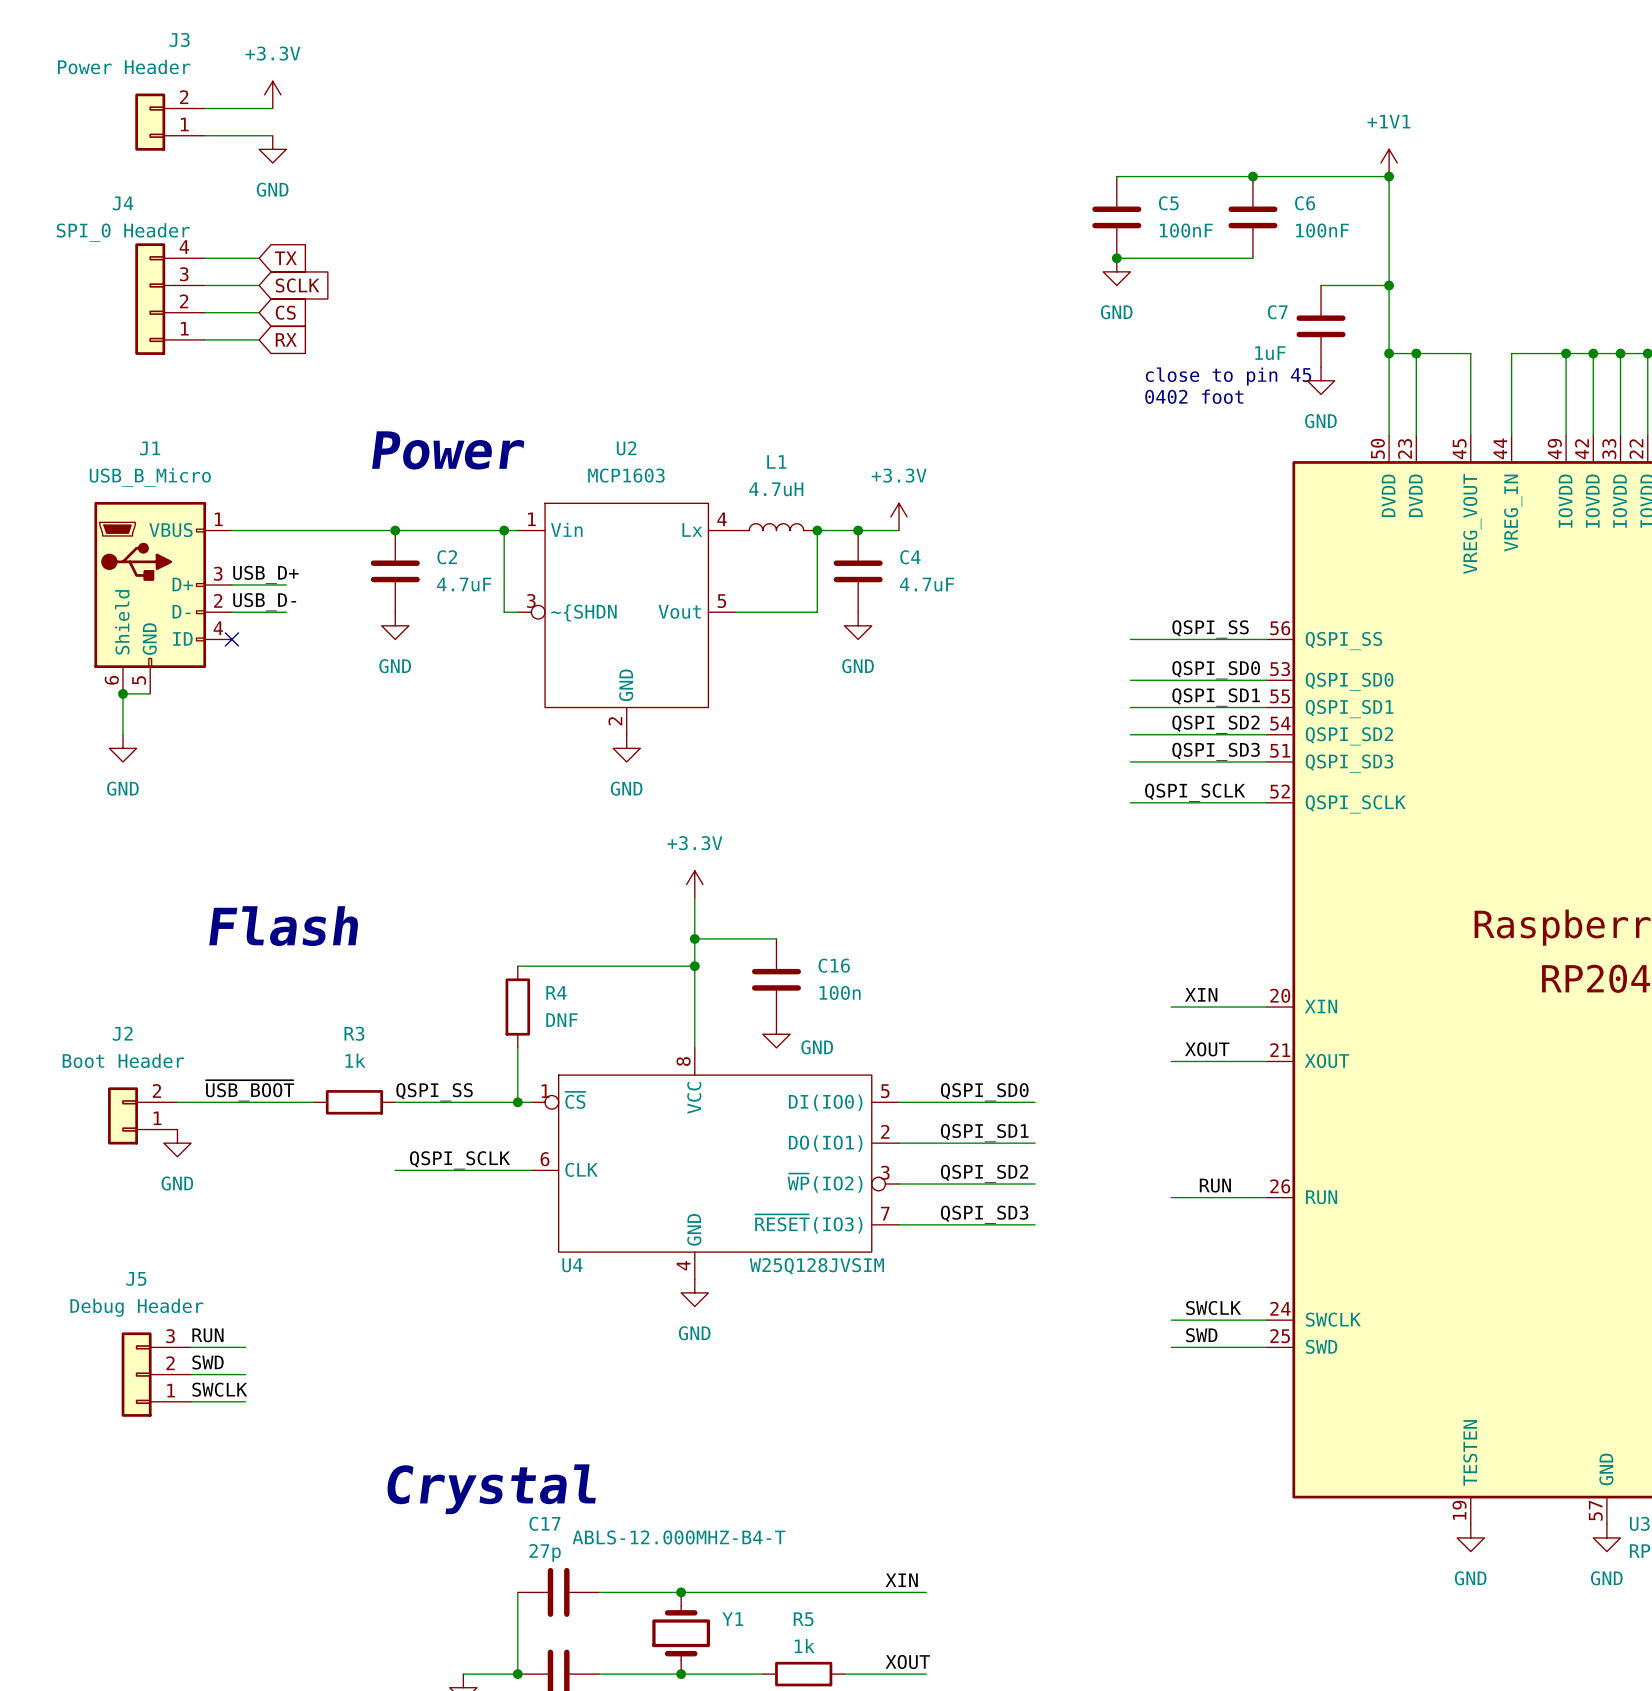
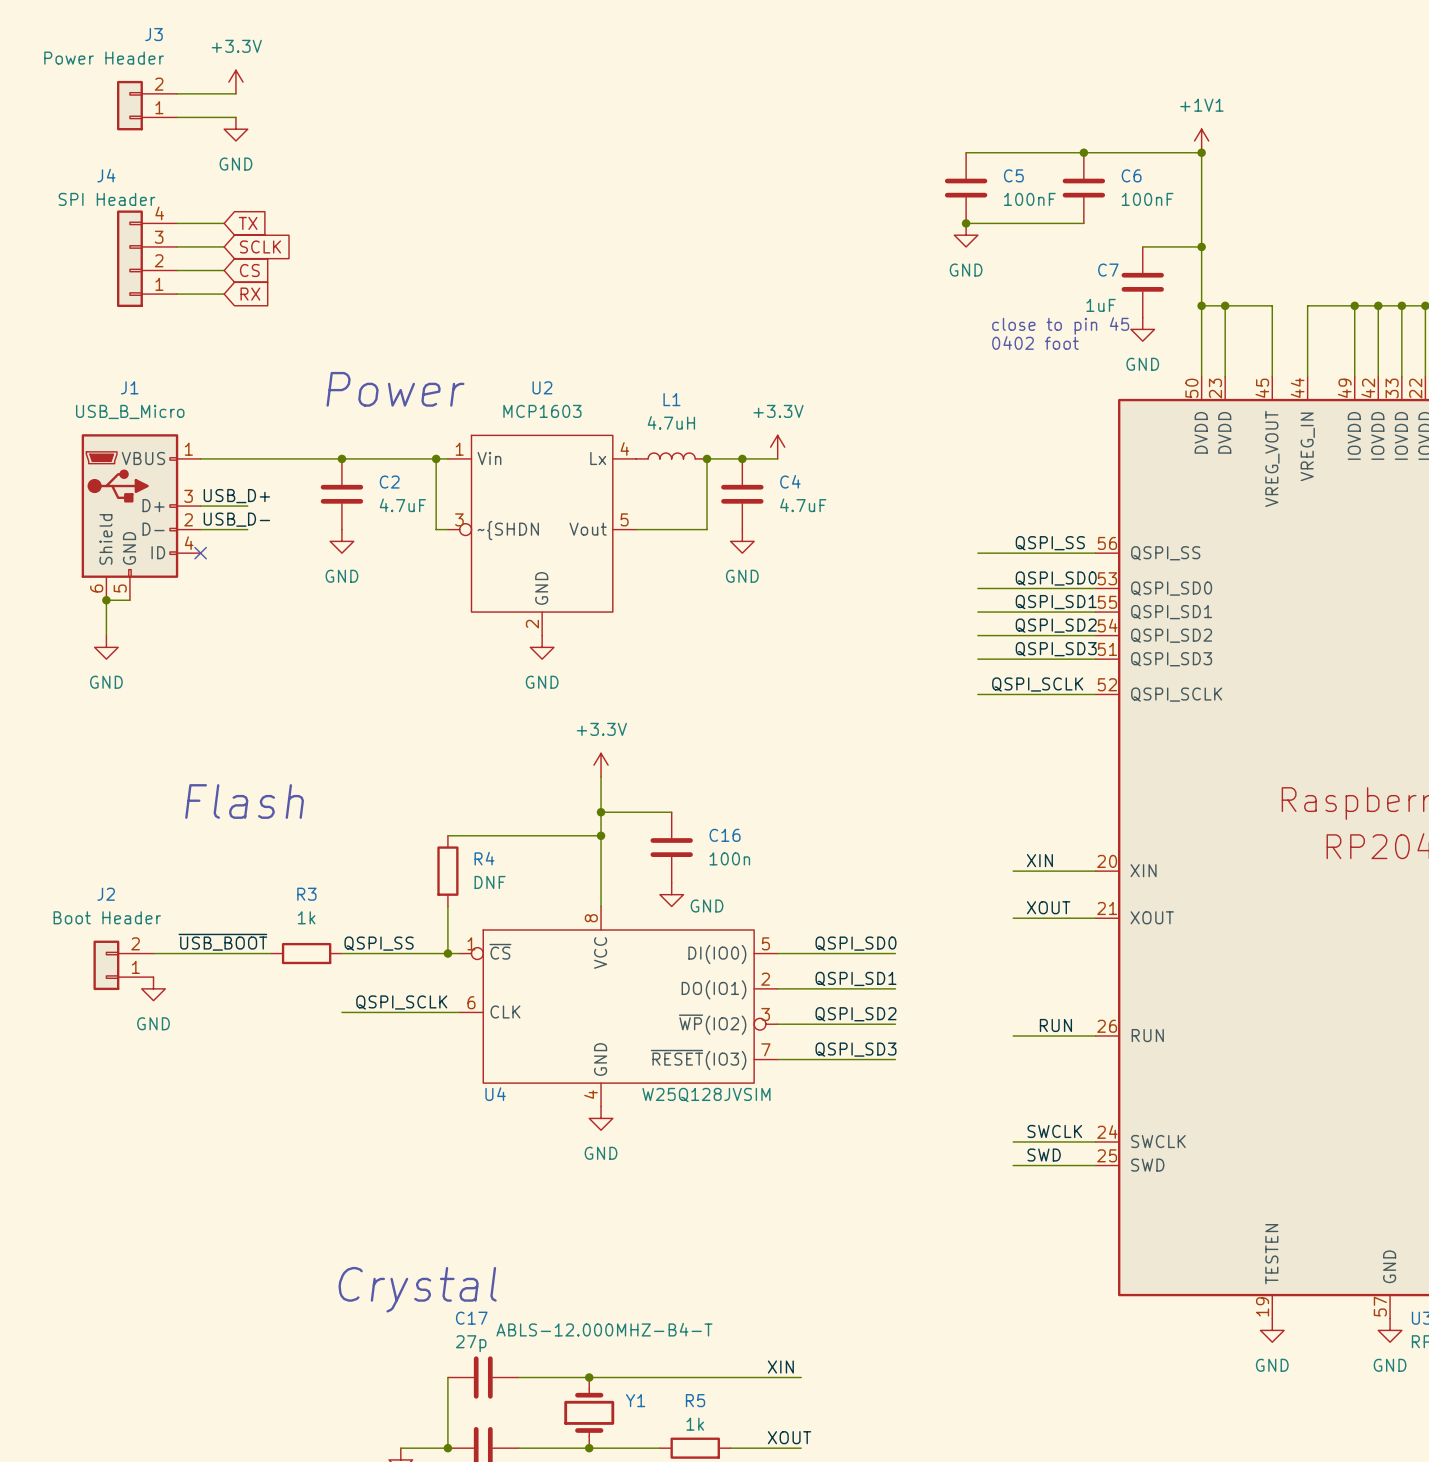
J4 value: SPI_0 Header (123, 232) -> SPI Header (106, 199)
label: RUN (207, 1335) -> none
wire: (191, 1347) (245, 1347) -> none
label: SWD (207, 1362) -> none
J5: Debug Header (156, 1374) -> none
wire: (191, 1374) (245, 1374) -> none
label: SWCLK (219, 1389) -> none
wire: (191, 1401) (245, 1401) -> none

